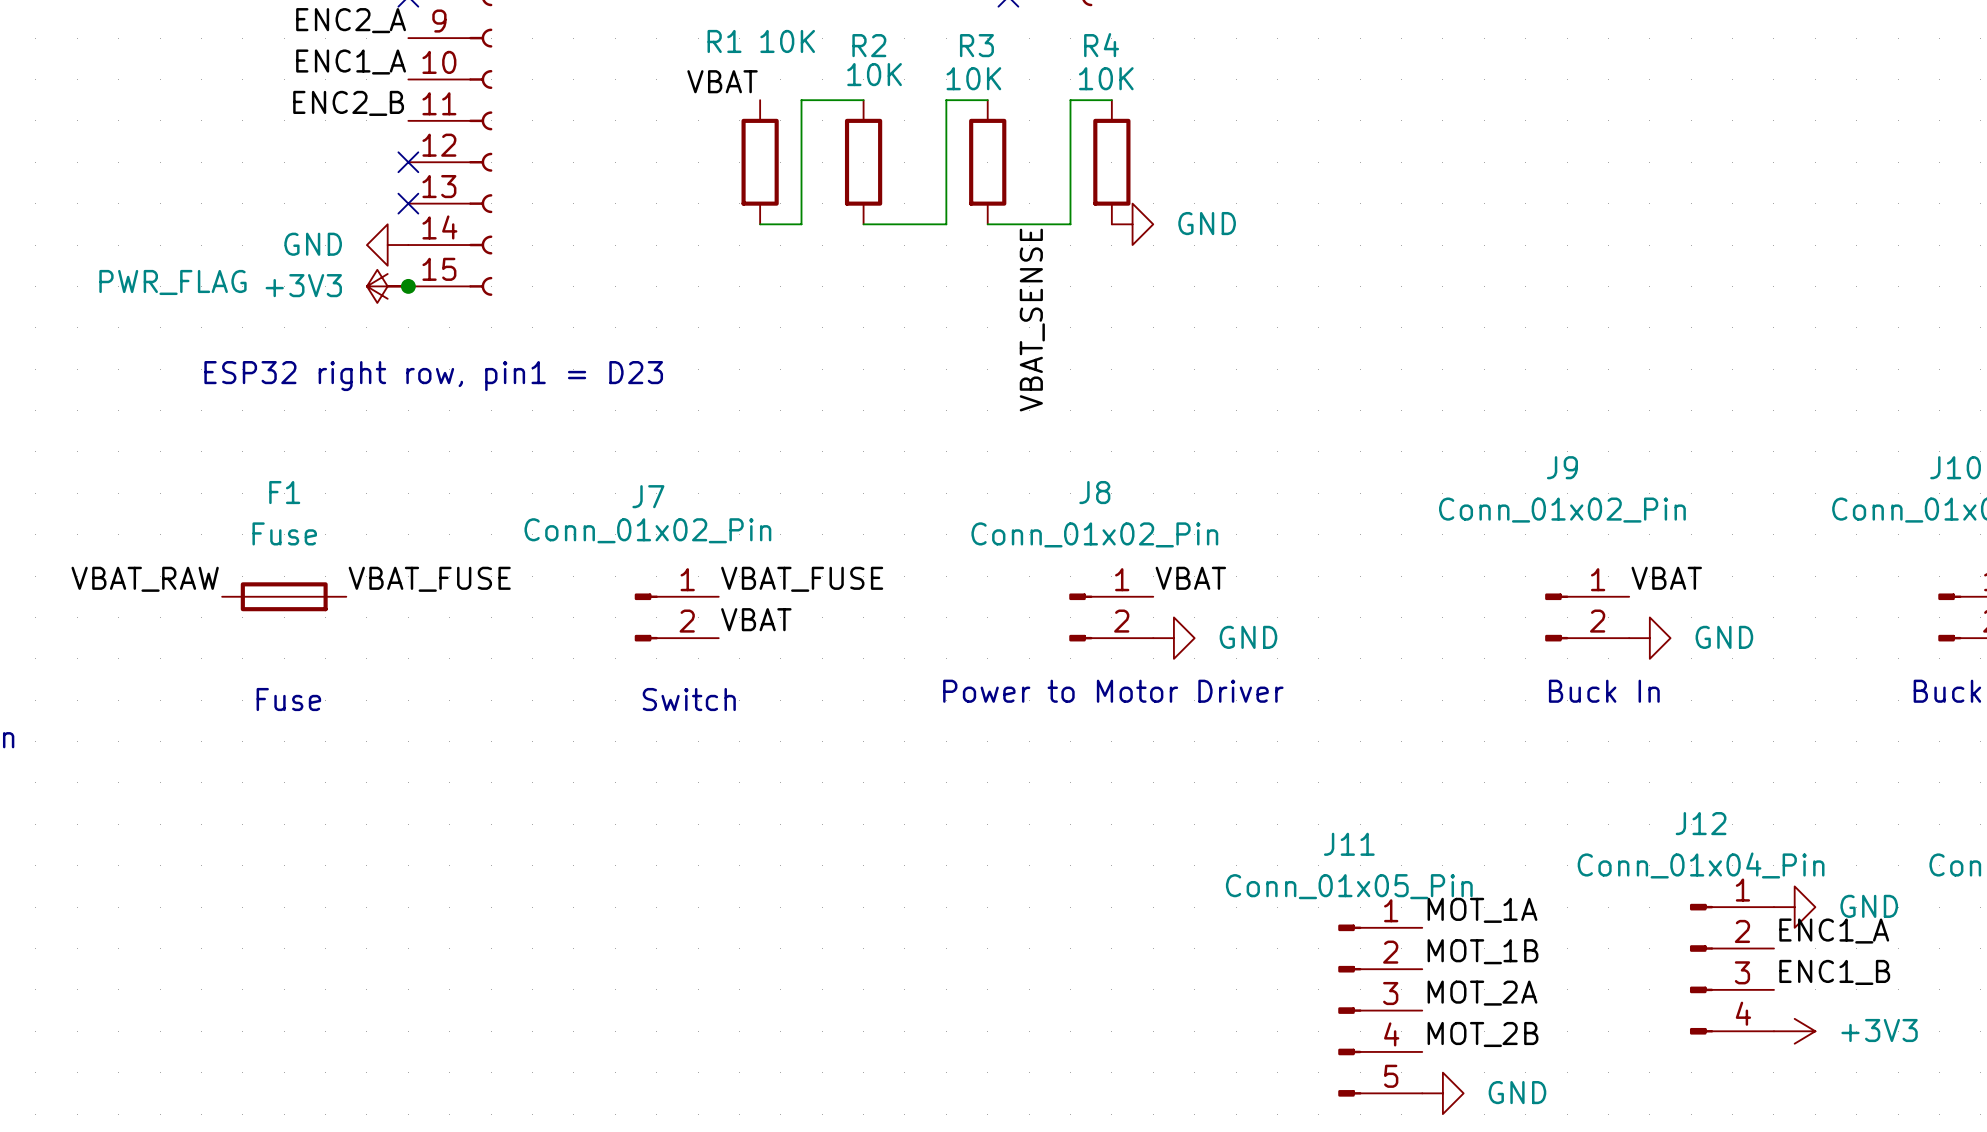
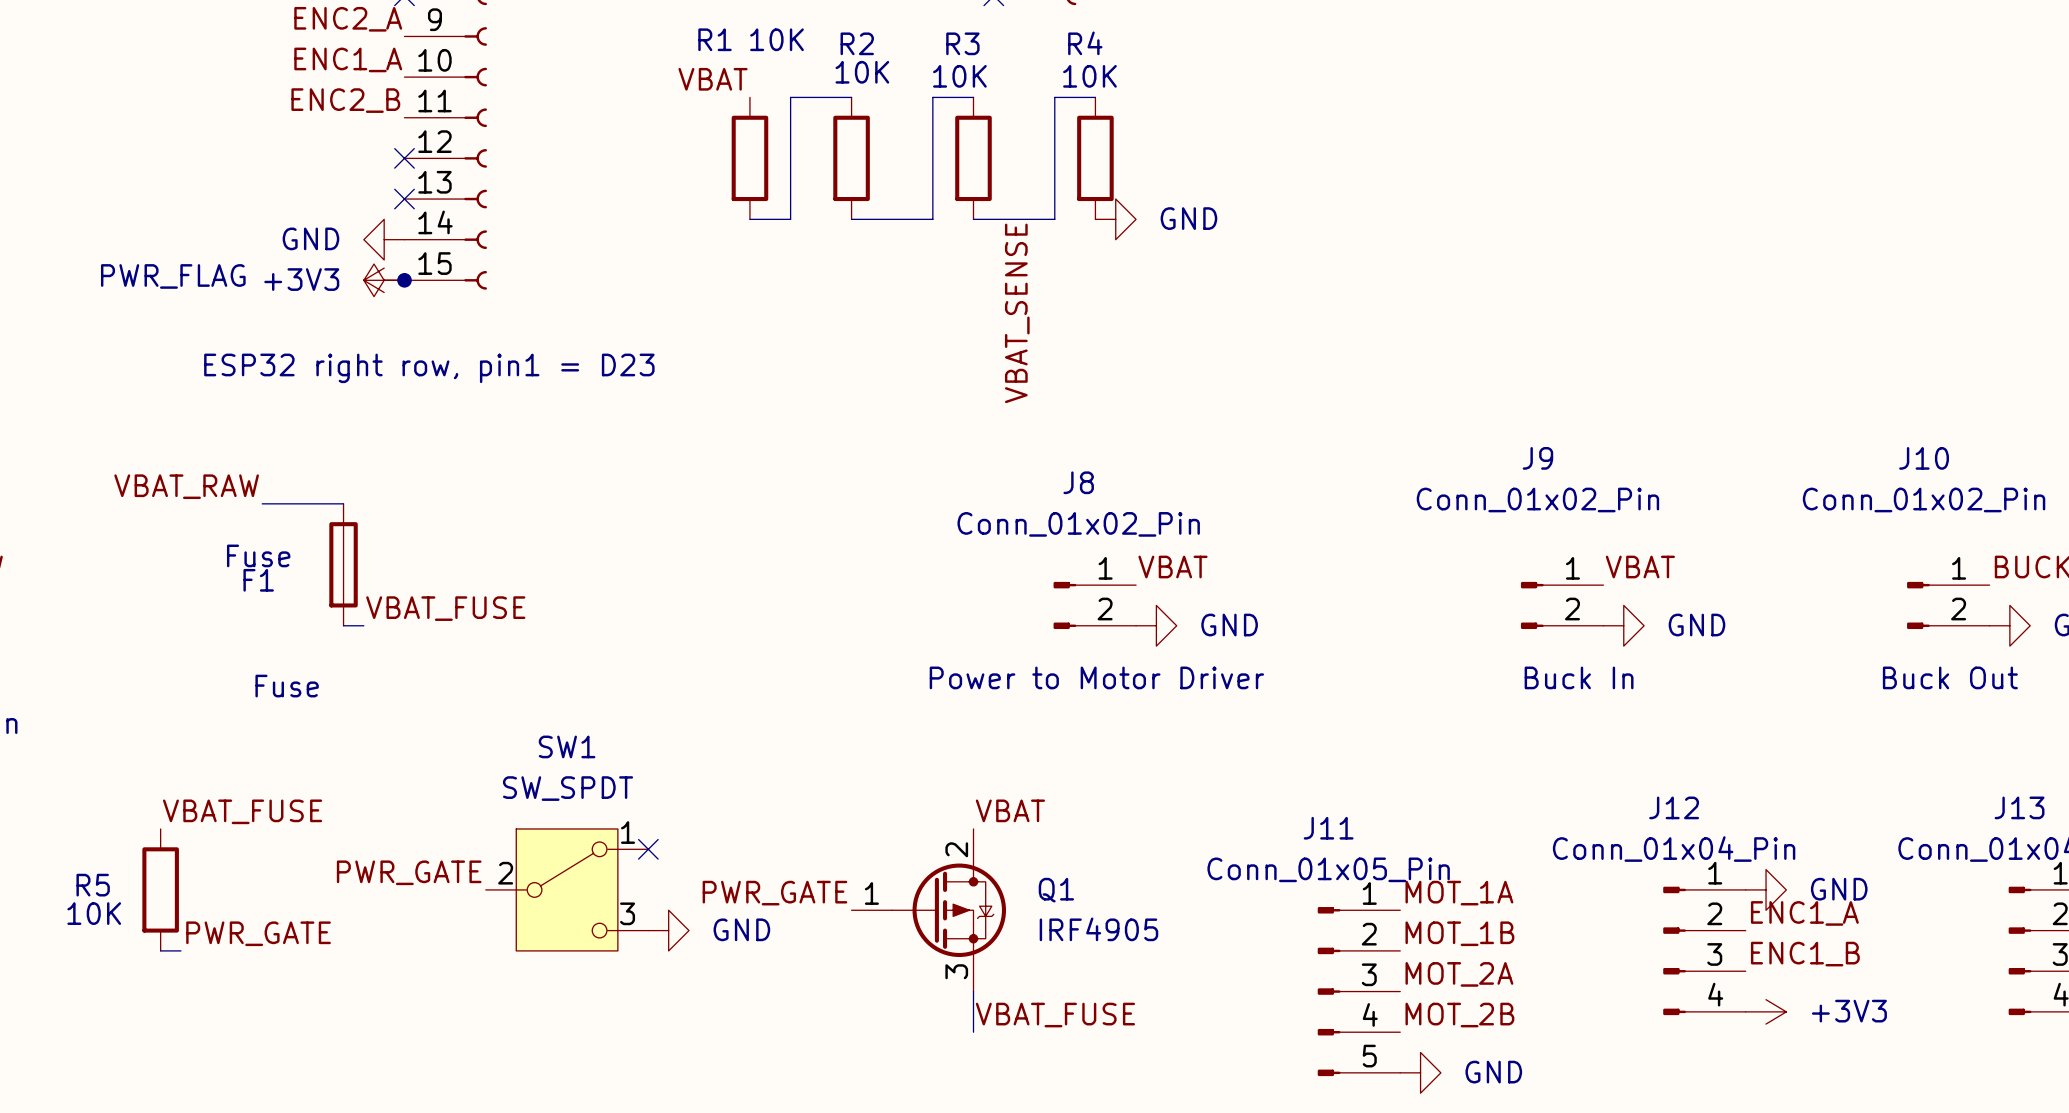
F1 name position: F1 (284, 492) -> F1 (258, 580)
wire: none -> (262, 503) (343, 503)
F1 value position: Fuse (284, 533) -> Fuse (258, 555)
label position: VBAT_RAW (145, 579) -> VBAT_RAW (186, 486)
label position: VBAT_FUSE (429, 579) -> VBAT_FUSE (445, 608)
label: VBAT_FUSE (802, 579) -> none
F1 rotation: 0° (284, 596) -> 90° clockwise (343, 564)
J7: Conn_01x02_Pin (676, 617) -> none
label position: VBAT (756, 619) -> VBAT (1010, 810)
wire: none -> (343, 625) (363, 625)
text: Switch (689, 699) -> none
label: none -> VBAT_FUSE (242, 811)
no-connect mark: none -> (648, 849)
label: none -> PWR_GATE (409, 872)
R5: none -> 10K (160, 889)
SW1: none -> SW_SPDT (567, 889)
label: none -> PWR_GATE (774, 893)
Q1: none -> IRF4905 (928, 910)
power symbol: none -> GND (668, 930)
label: none -> PWR_GATE (258, 933)
wire: none -> (160, 950) (180, 950)
wire: none -> (973, 991) (973, 1032)
label: none -> VBAT_FUSE (1055, 1015)

